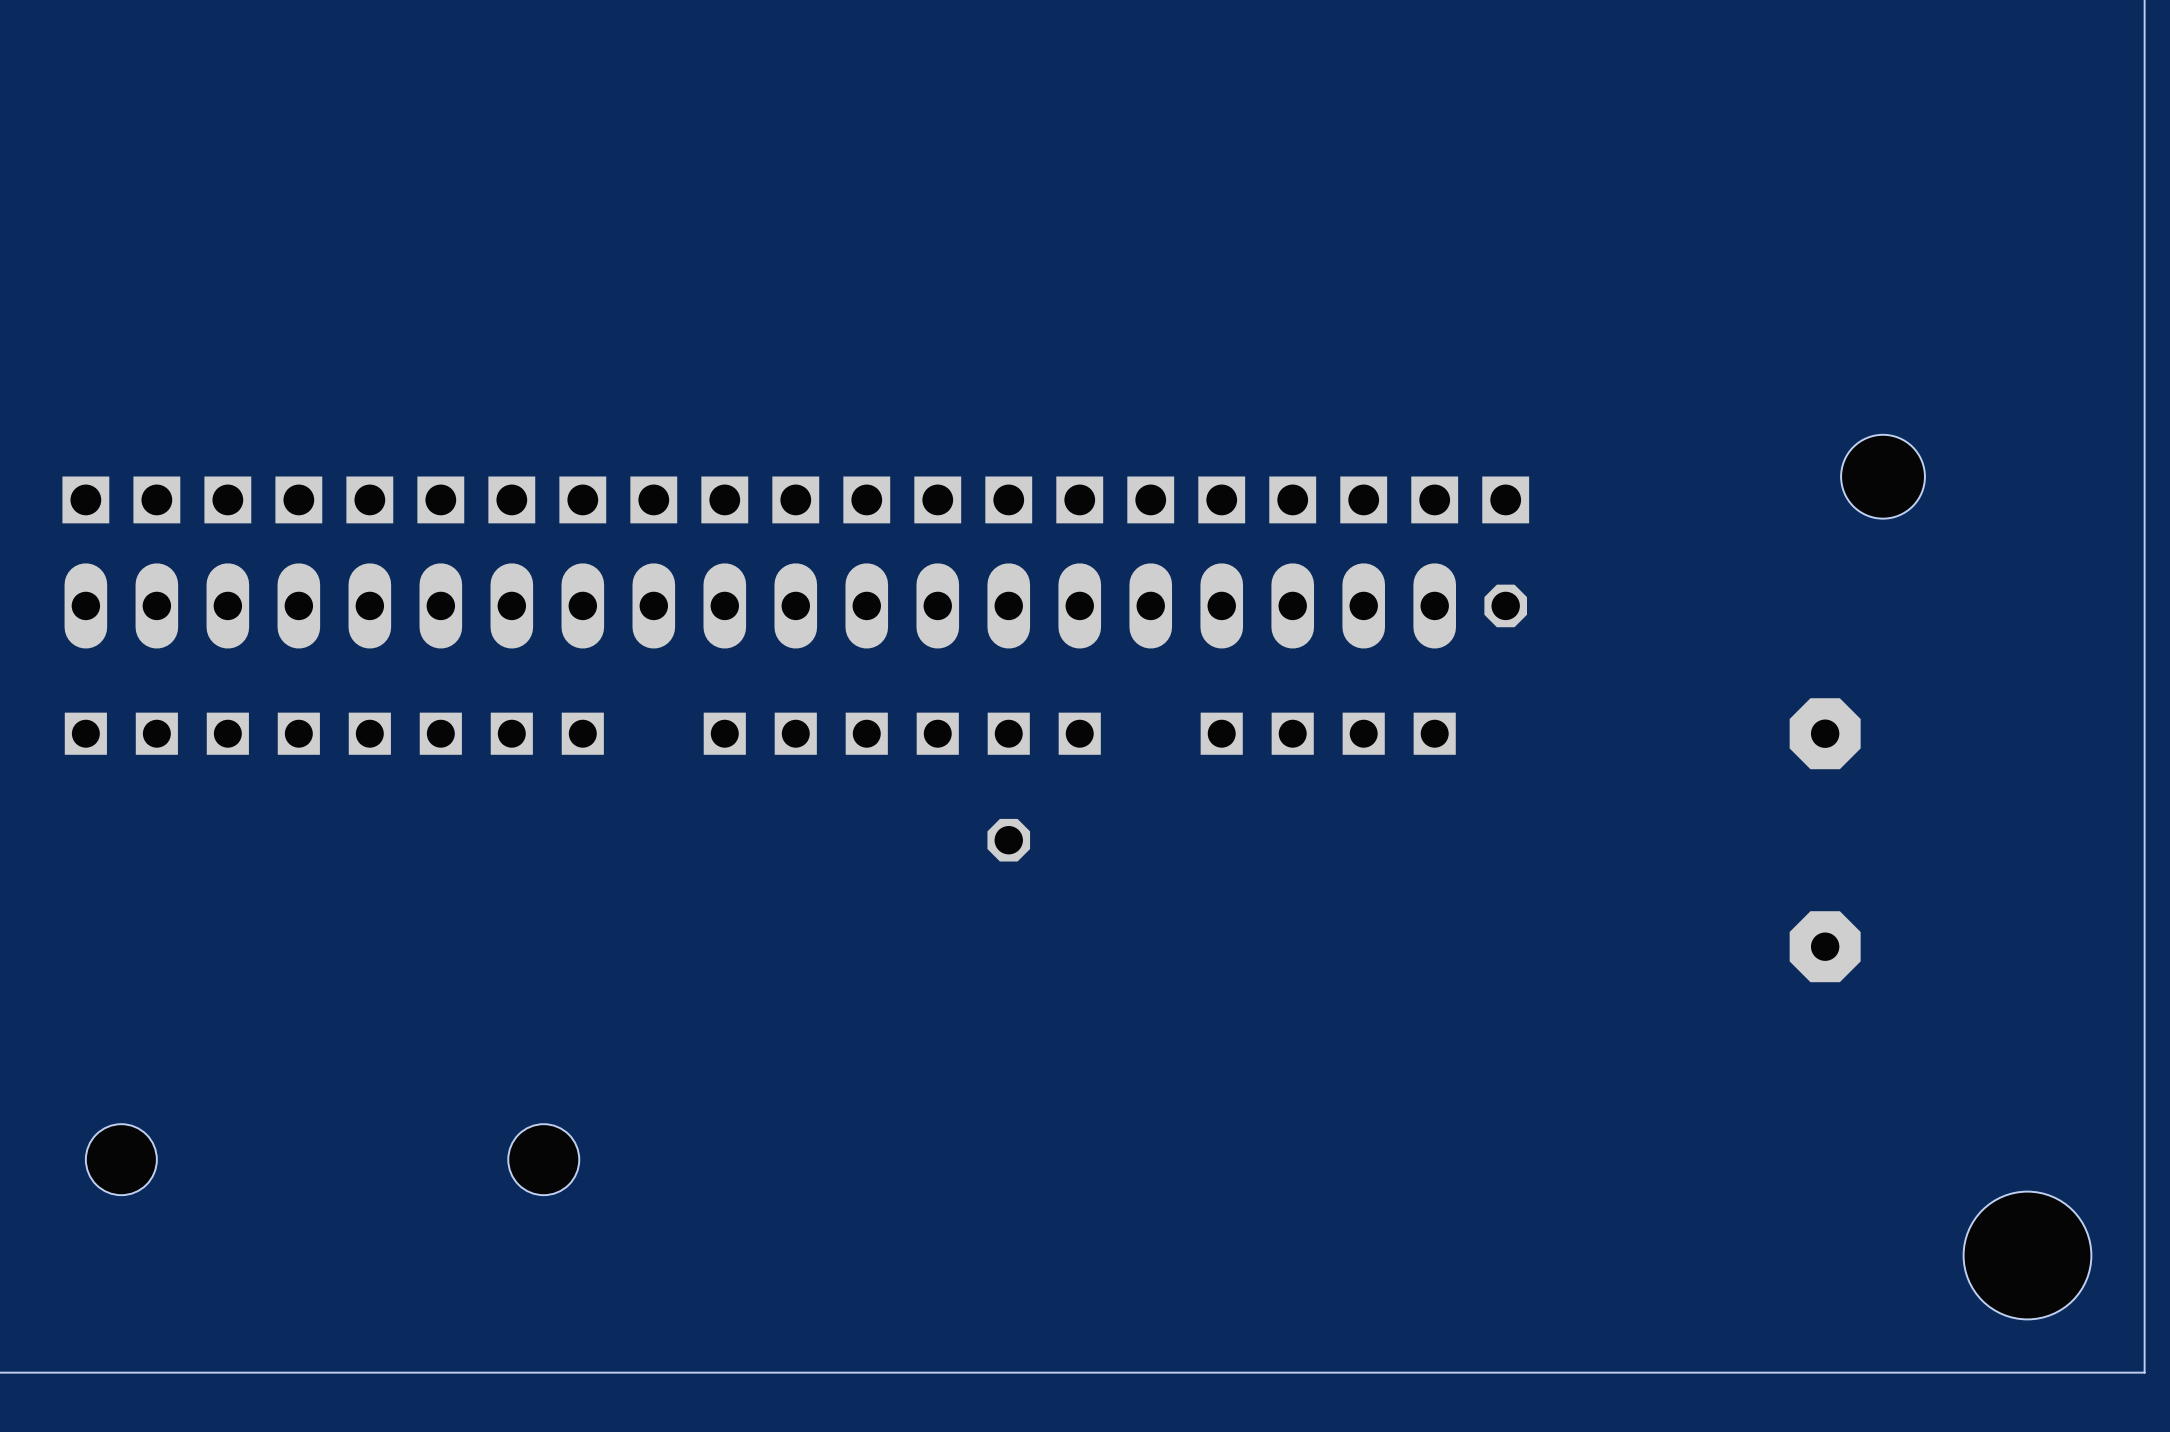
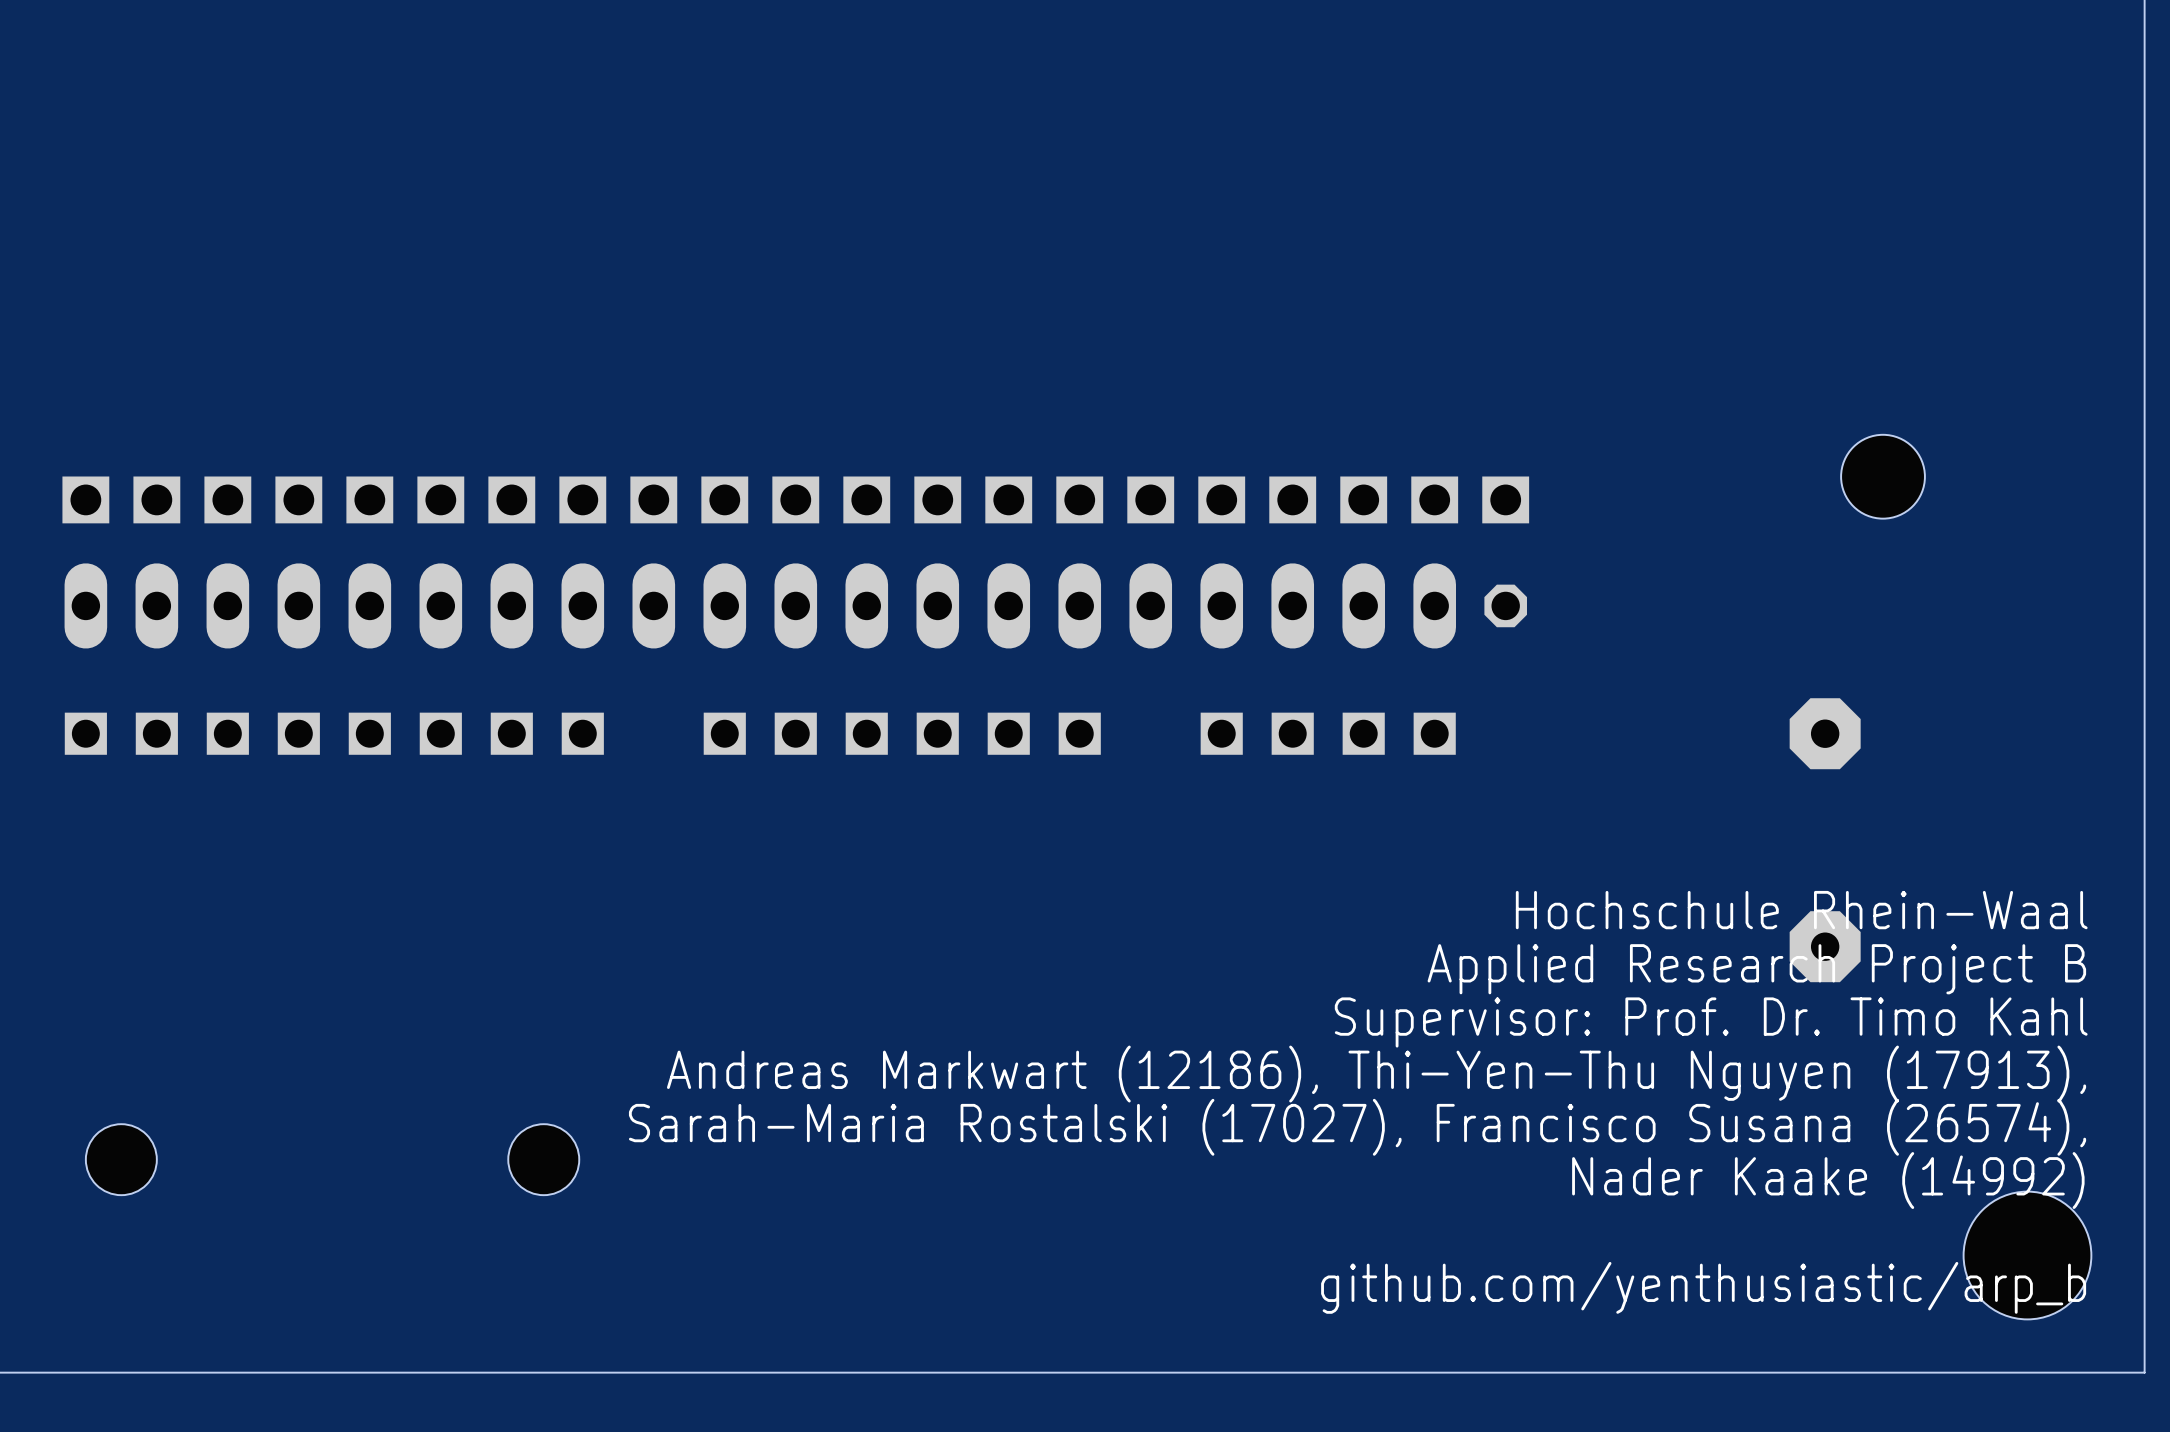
part: (1008, 840) -> none
text: none -> Hochschule Rhein-Waal (1801, 910)
text: none -> Applied Research Project B (1756, 969)
text: none -> Supervisor: Prof. Dr. Timo Kahl (1711, 1022)
text: none -> Andreas Markwart (12186), Thi-Yen-Thu Nguyen (17913), (1376, 1074)
text: none -> Sarah-Maria Rostalski (17027), Francisco Susana (26574), (1357, 1127)
text: none -> Nader Kaake (14992) (1828, 1180)
text: none -> github.com/yenthusiastic/arp_b (1703, 1287)

